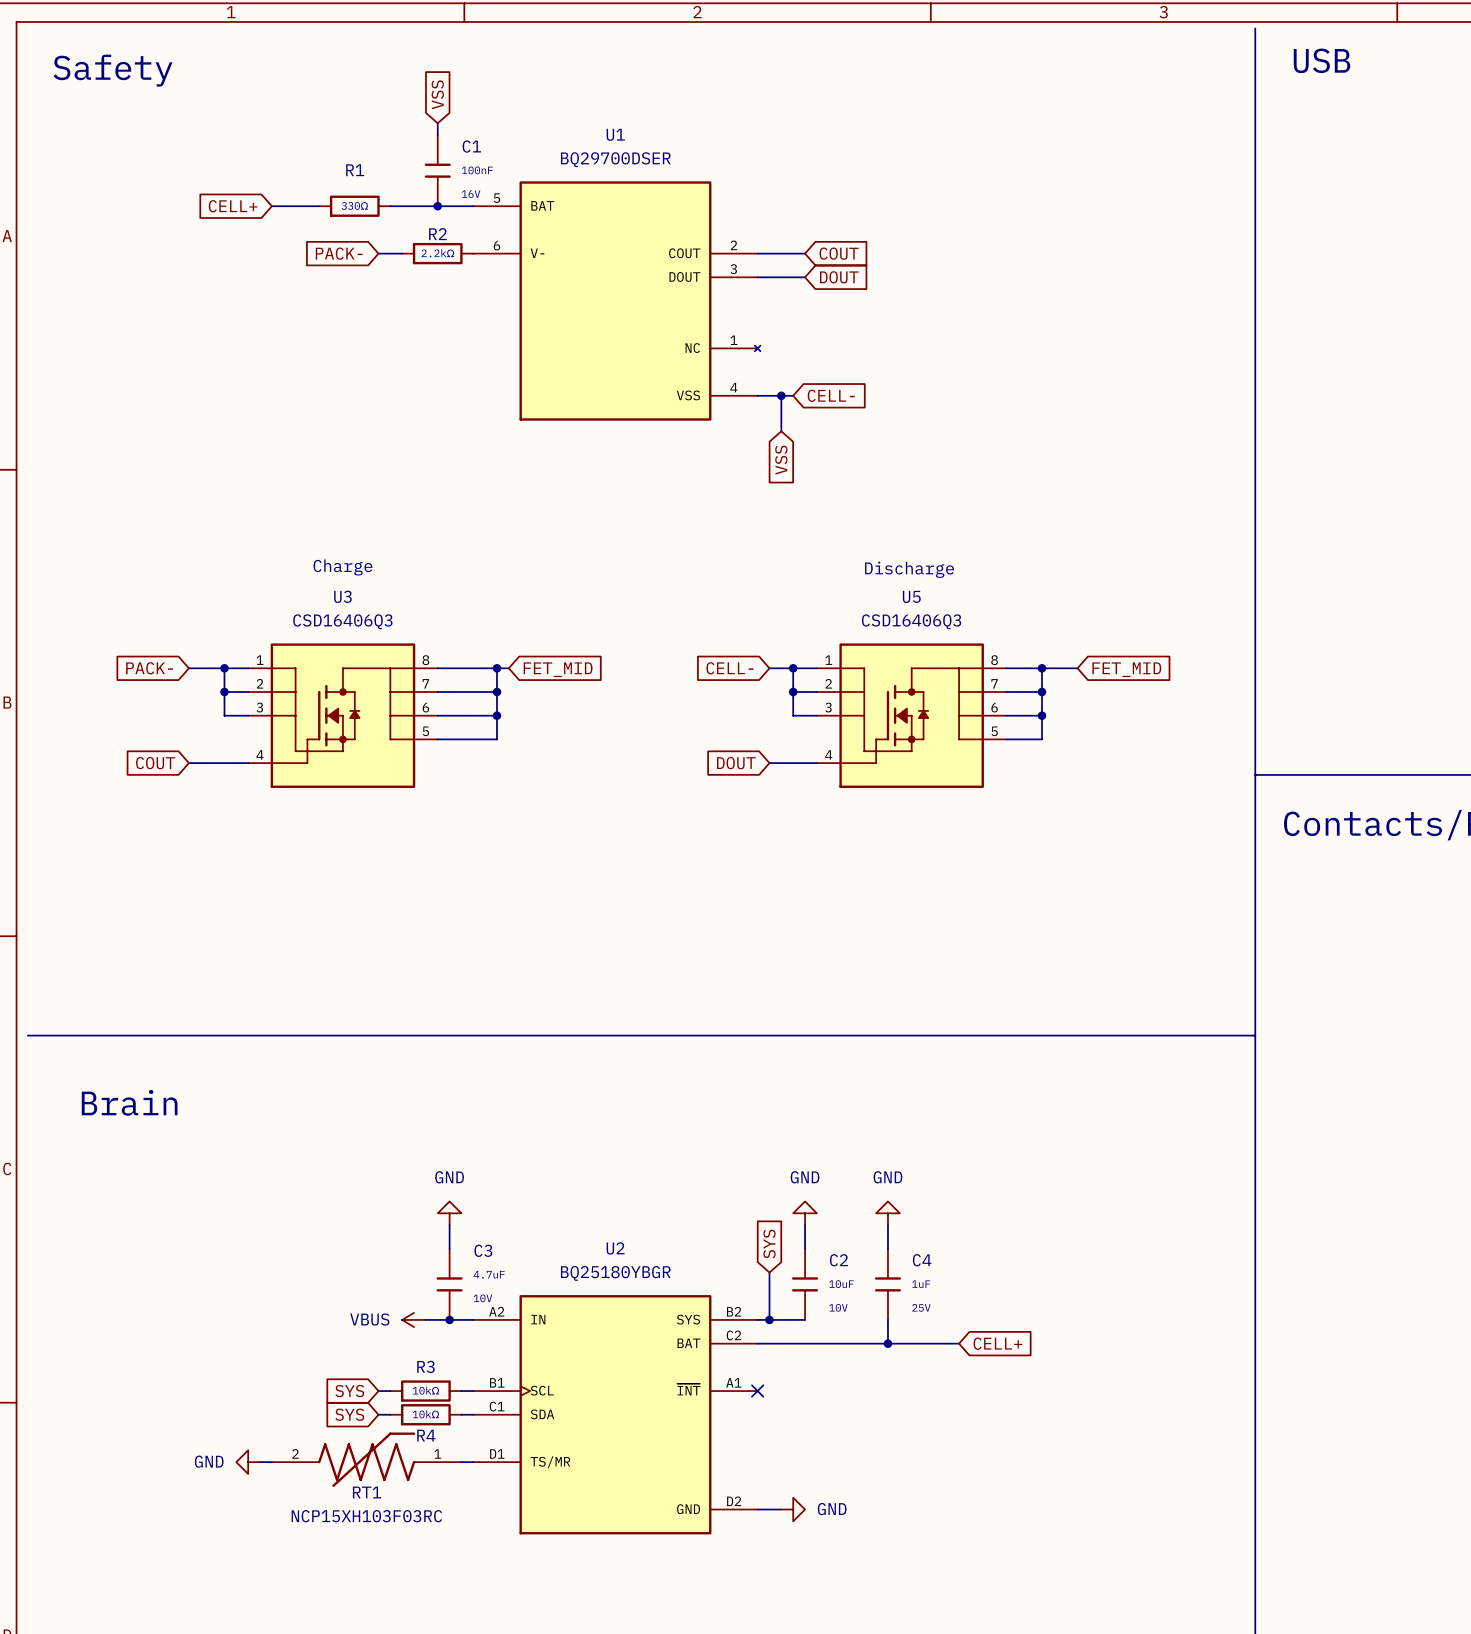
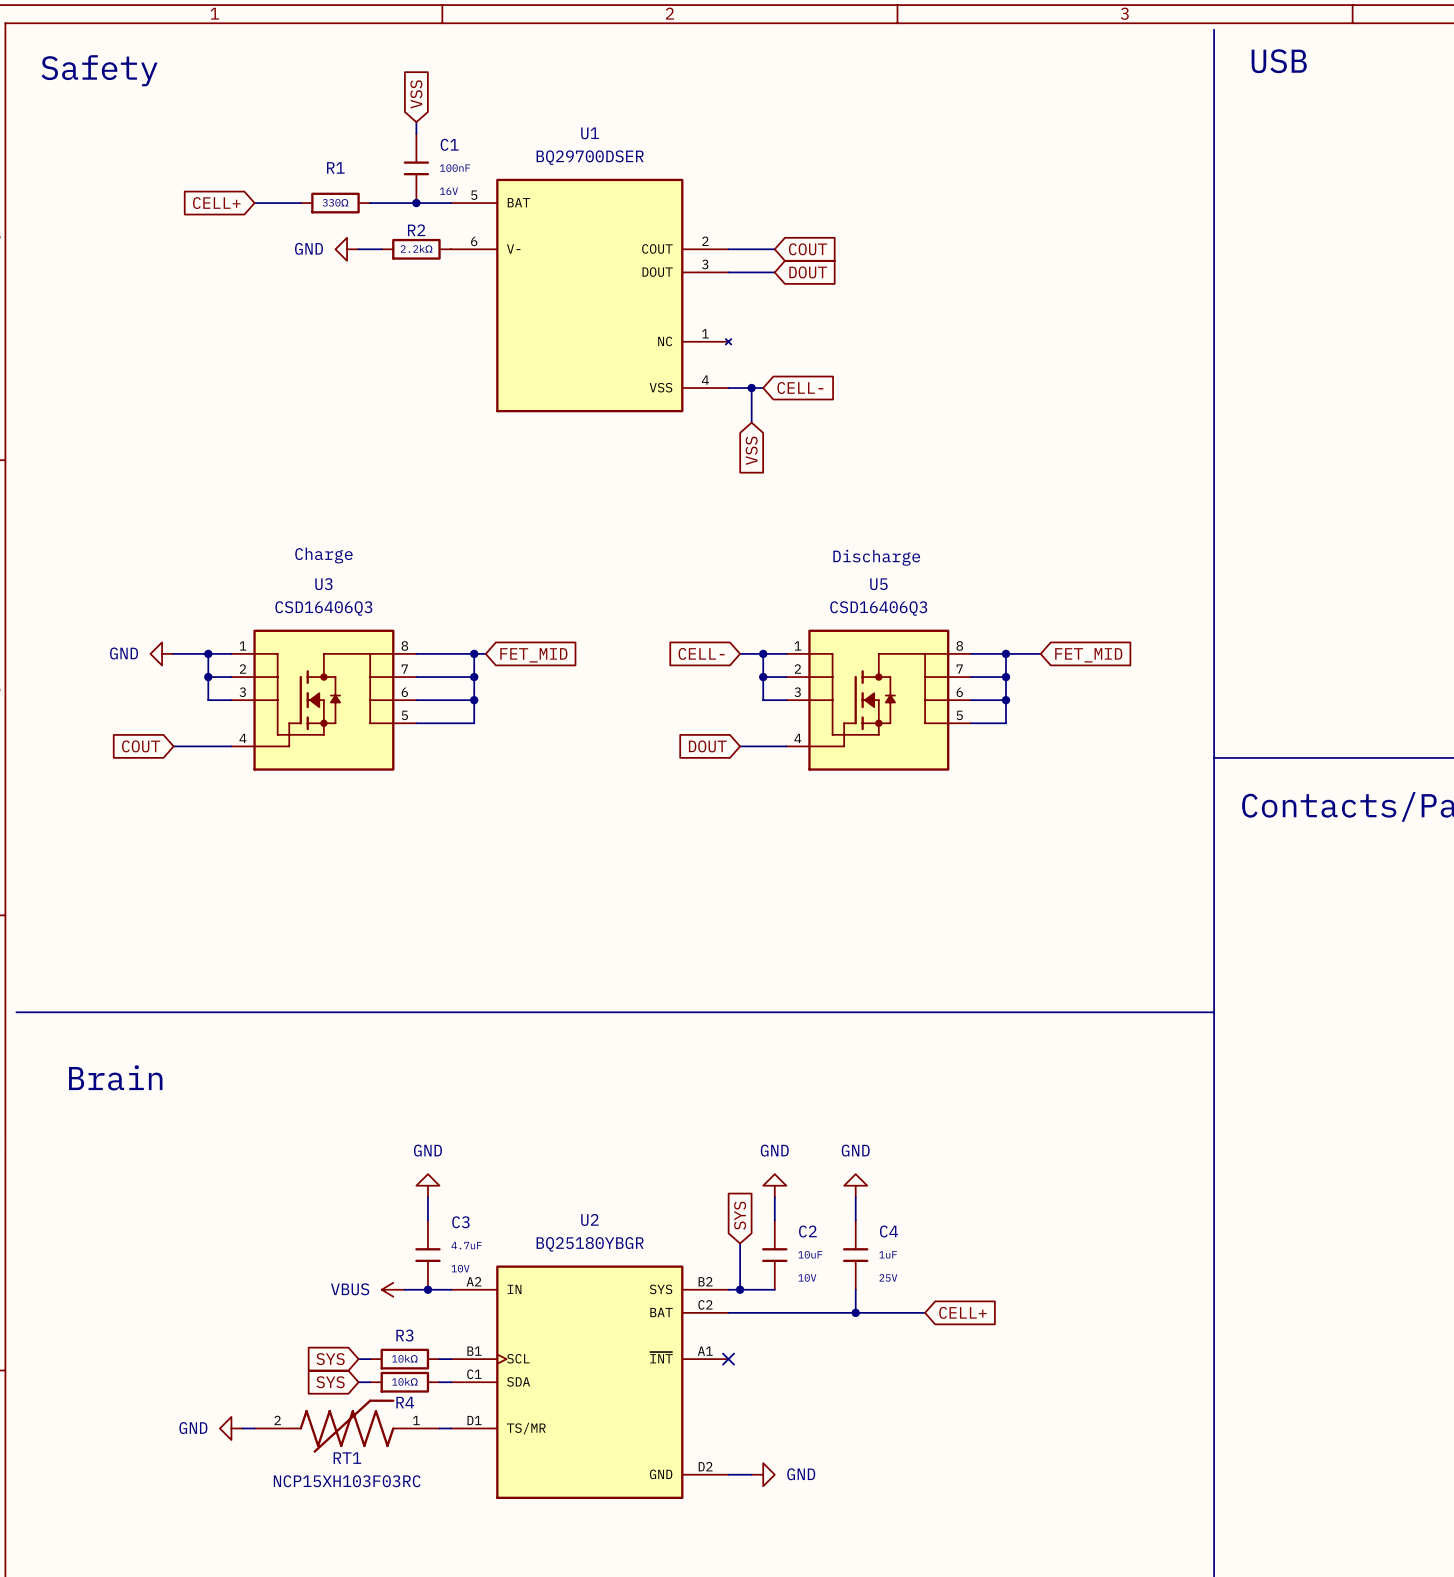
global label: PACK- (339, 253) -> none
power symbol: none -> GND (347, 249)
global label: PACK- (149, 668) -> none
power symbol: none -> GND (162, 653)

